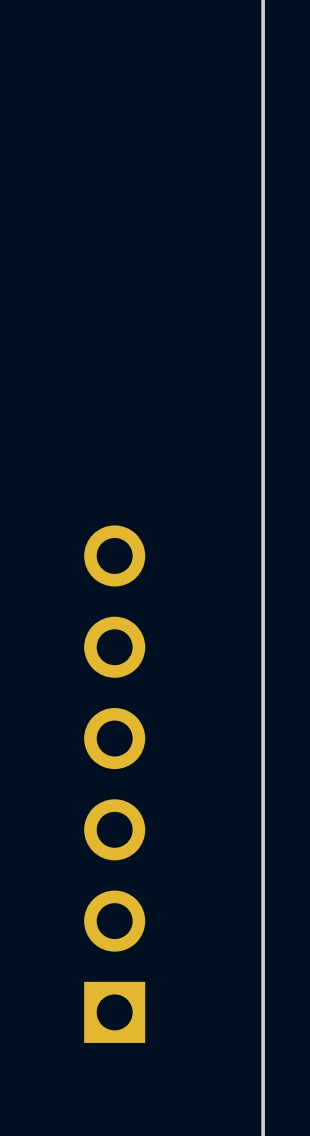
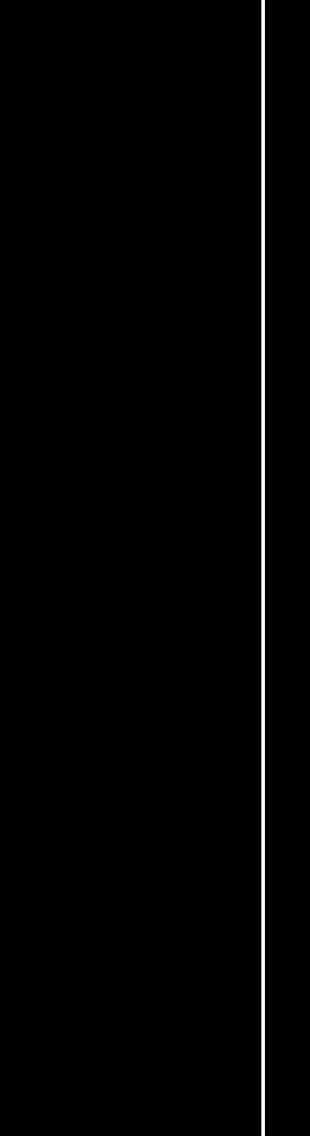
part: (114, 784) -> none

